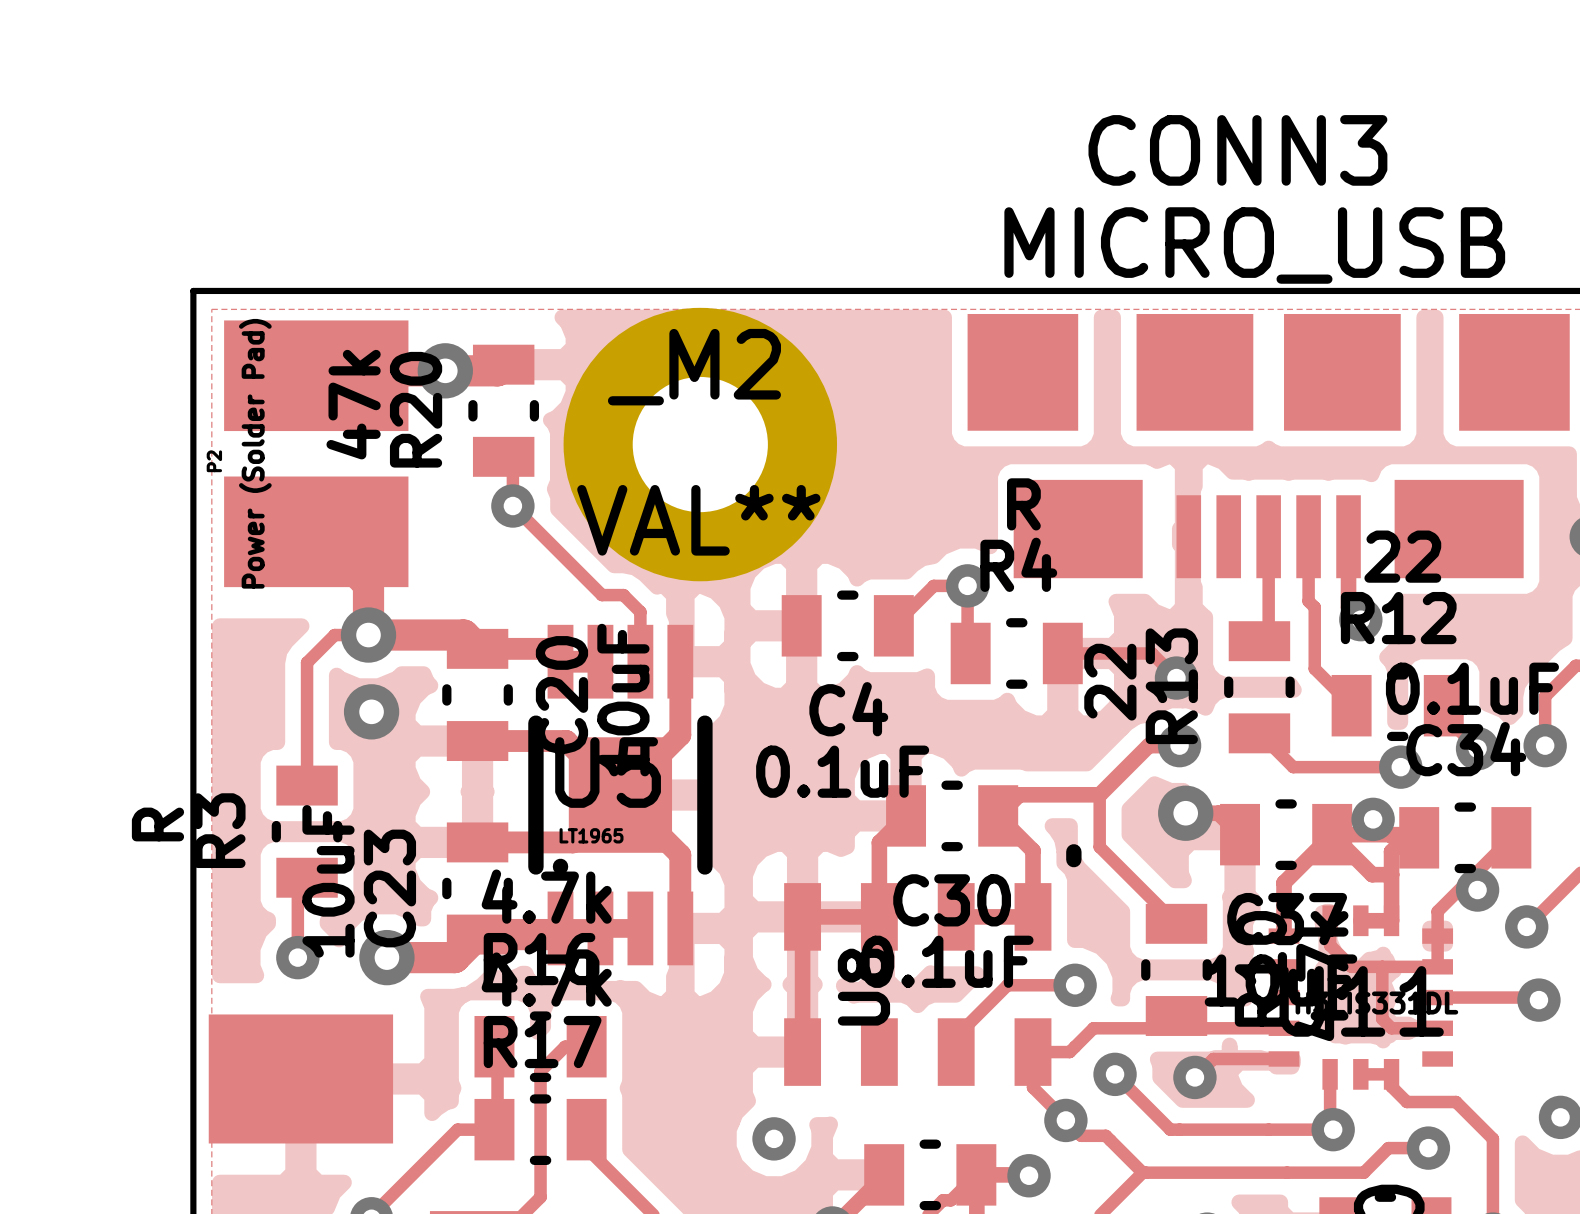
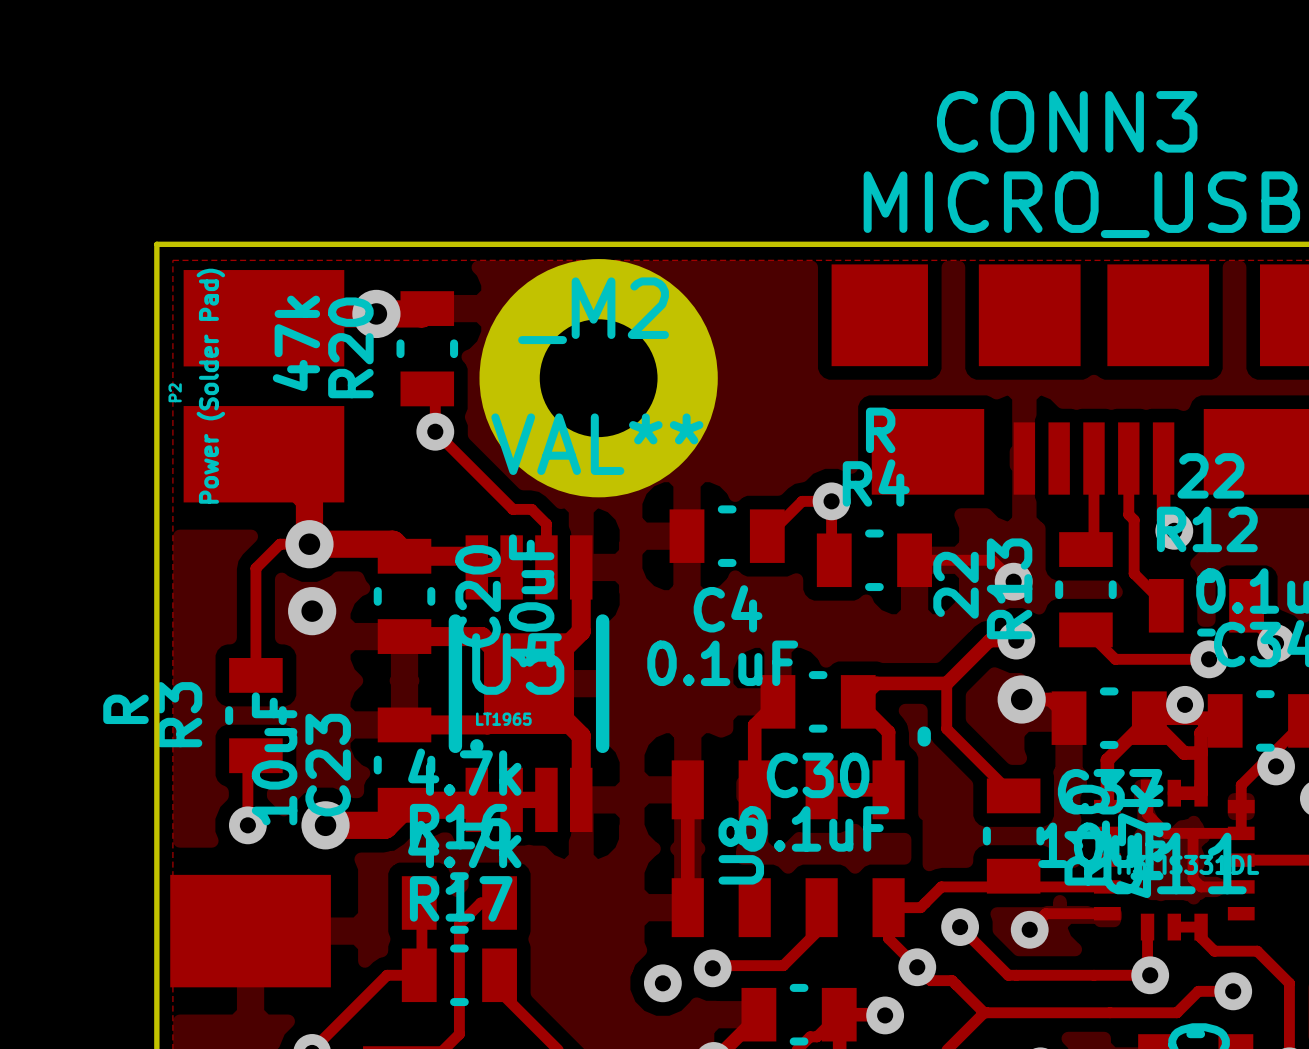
track: (802, 916) (879, 916) -> none
track: (1075, 985) (1007, 985) (956, 1036) (956, 1052) -> (712, 968) (715, 965) (783, 965) (821, 927) (821, 907)
via position: (1075, 985) -> (712, 968)

